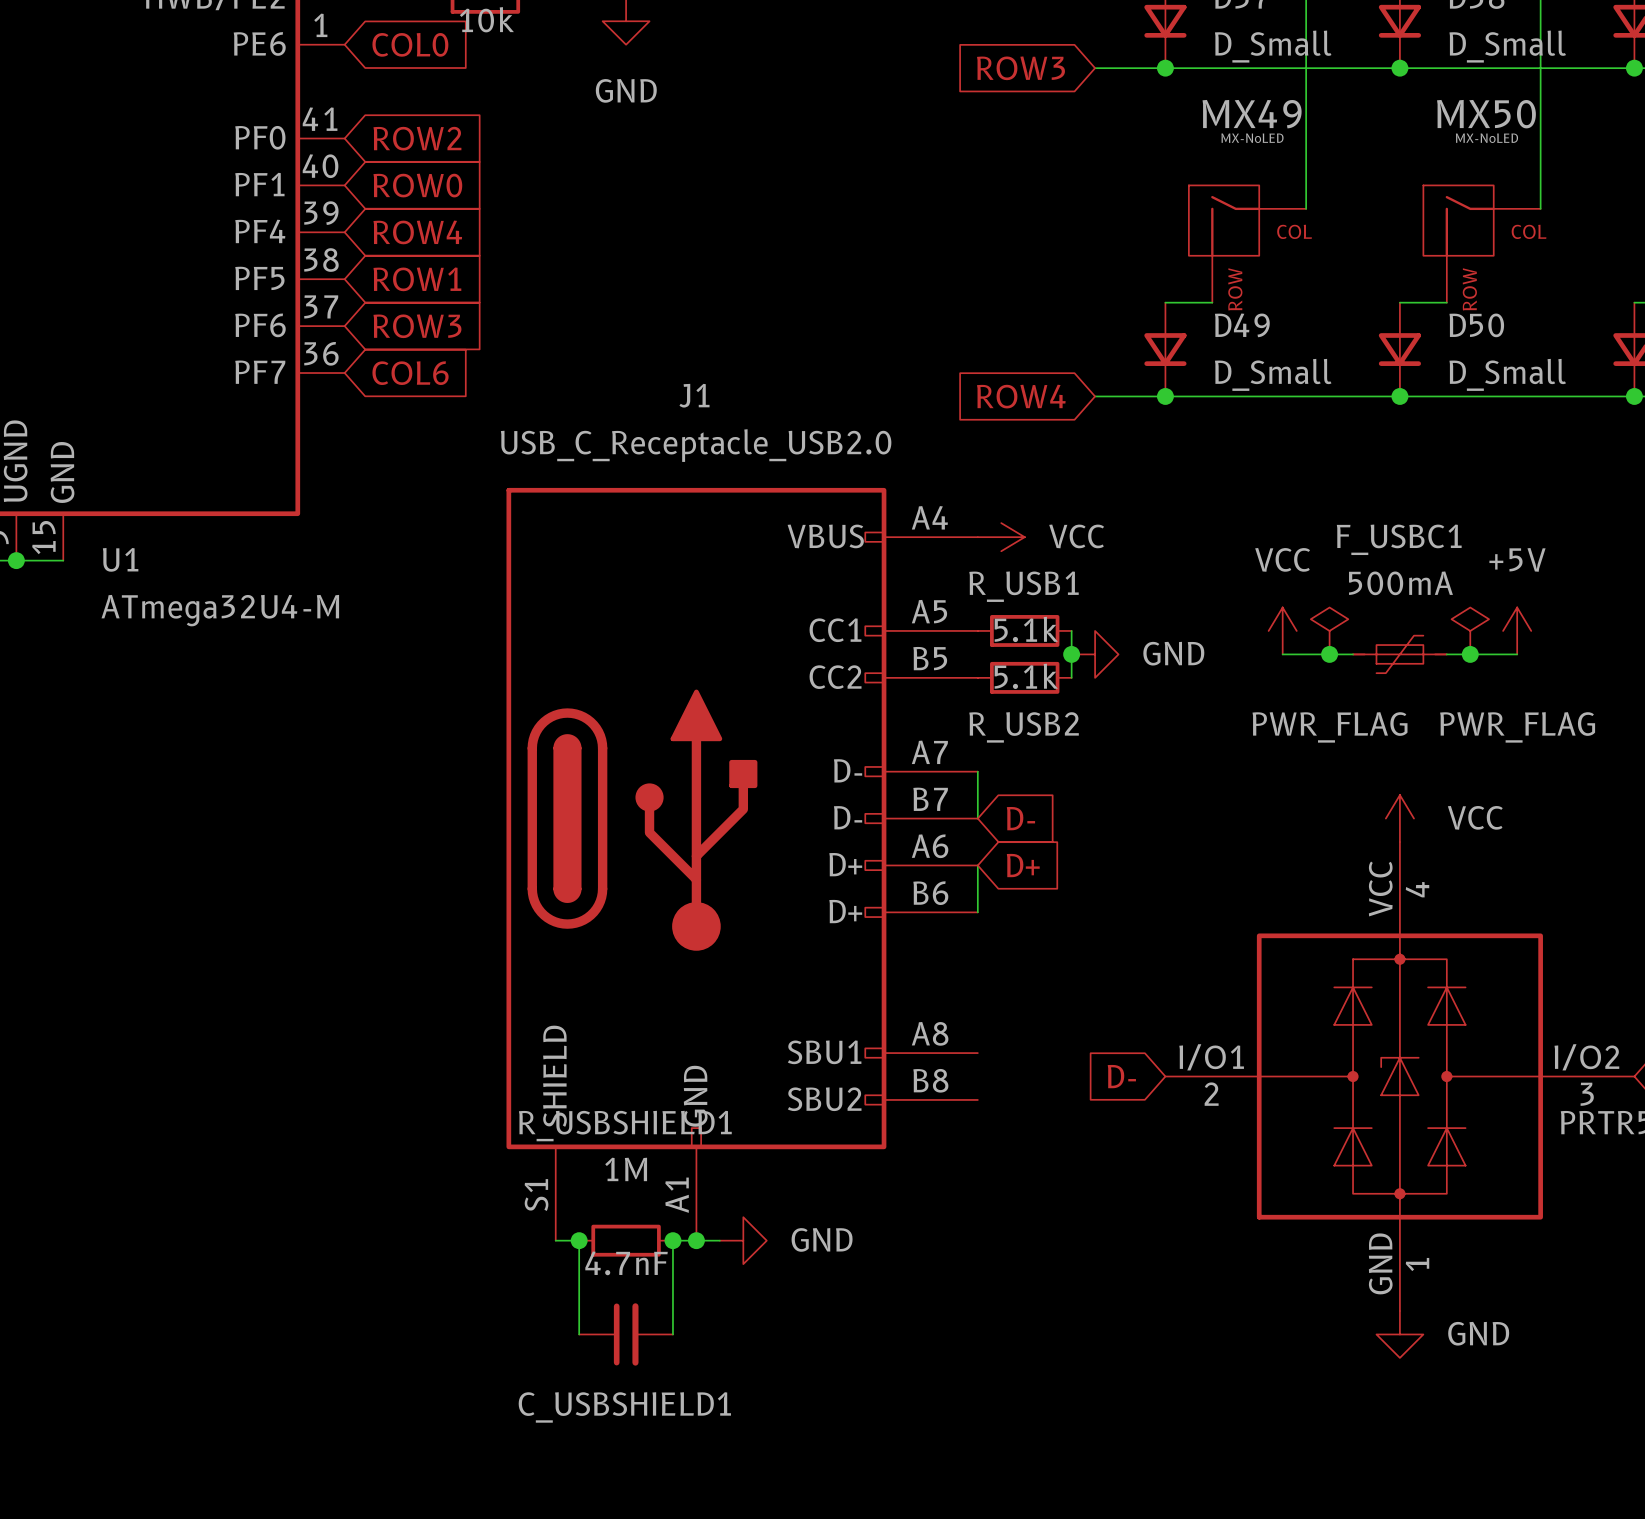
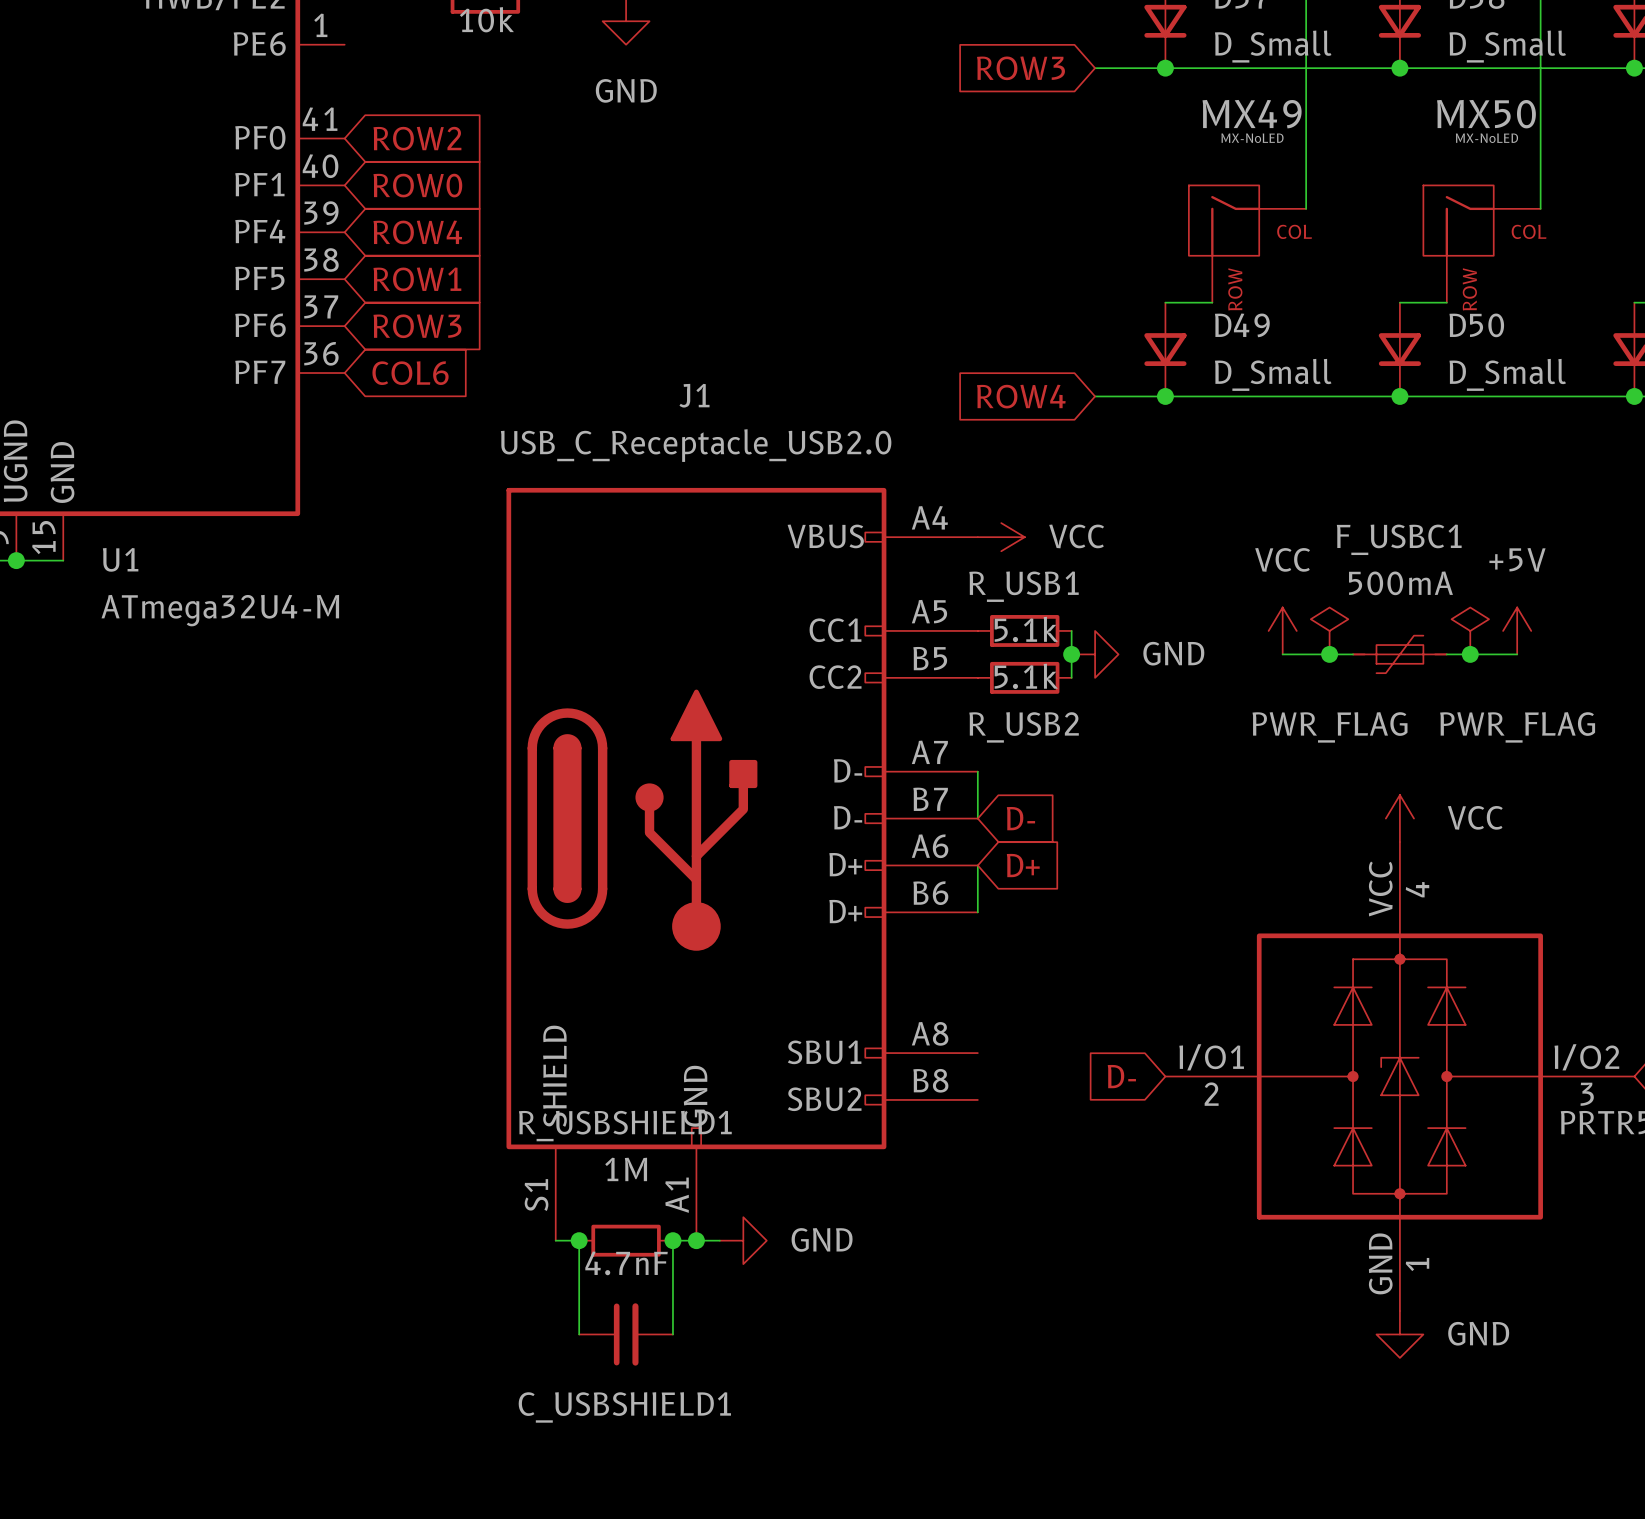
global label: COL0 (410, 44) -> none

